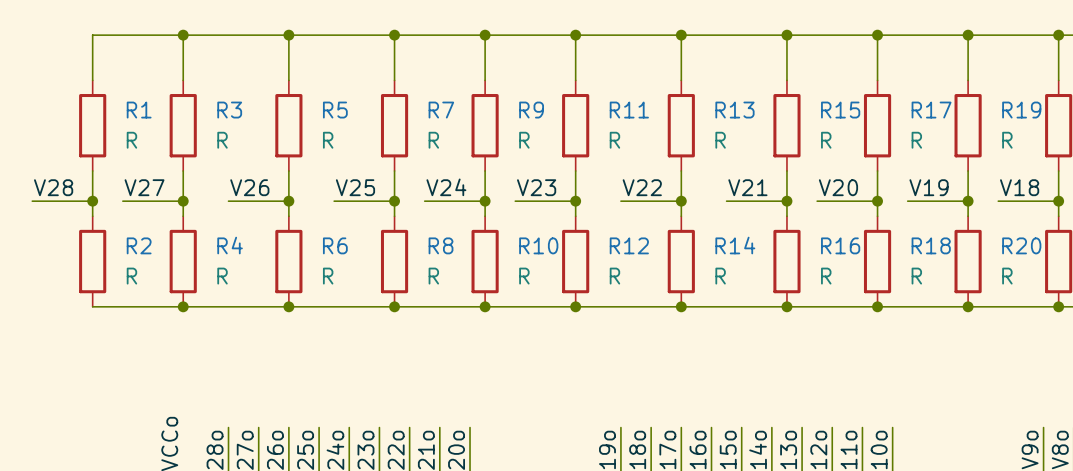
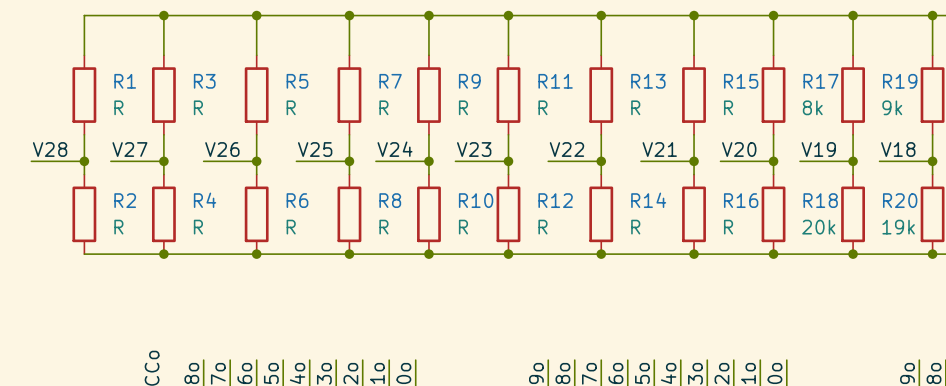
R17 value: R (916, 140) -> 8k (812, 107)
R19 value: R (1007, 140) -> 9k (892, 107)
R18 value: R (916, 276) -> 20k (818, 227)
R20 value: R (1007, 276) -> 19k (898, 227)

